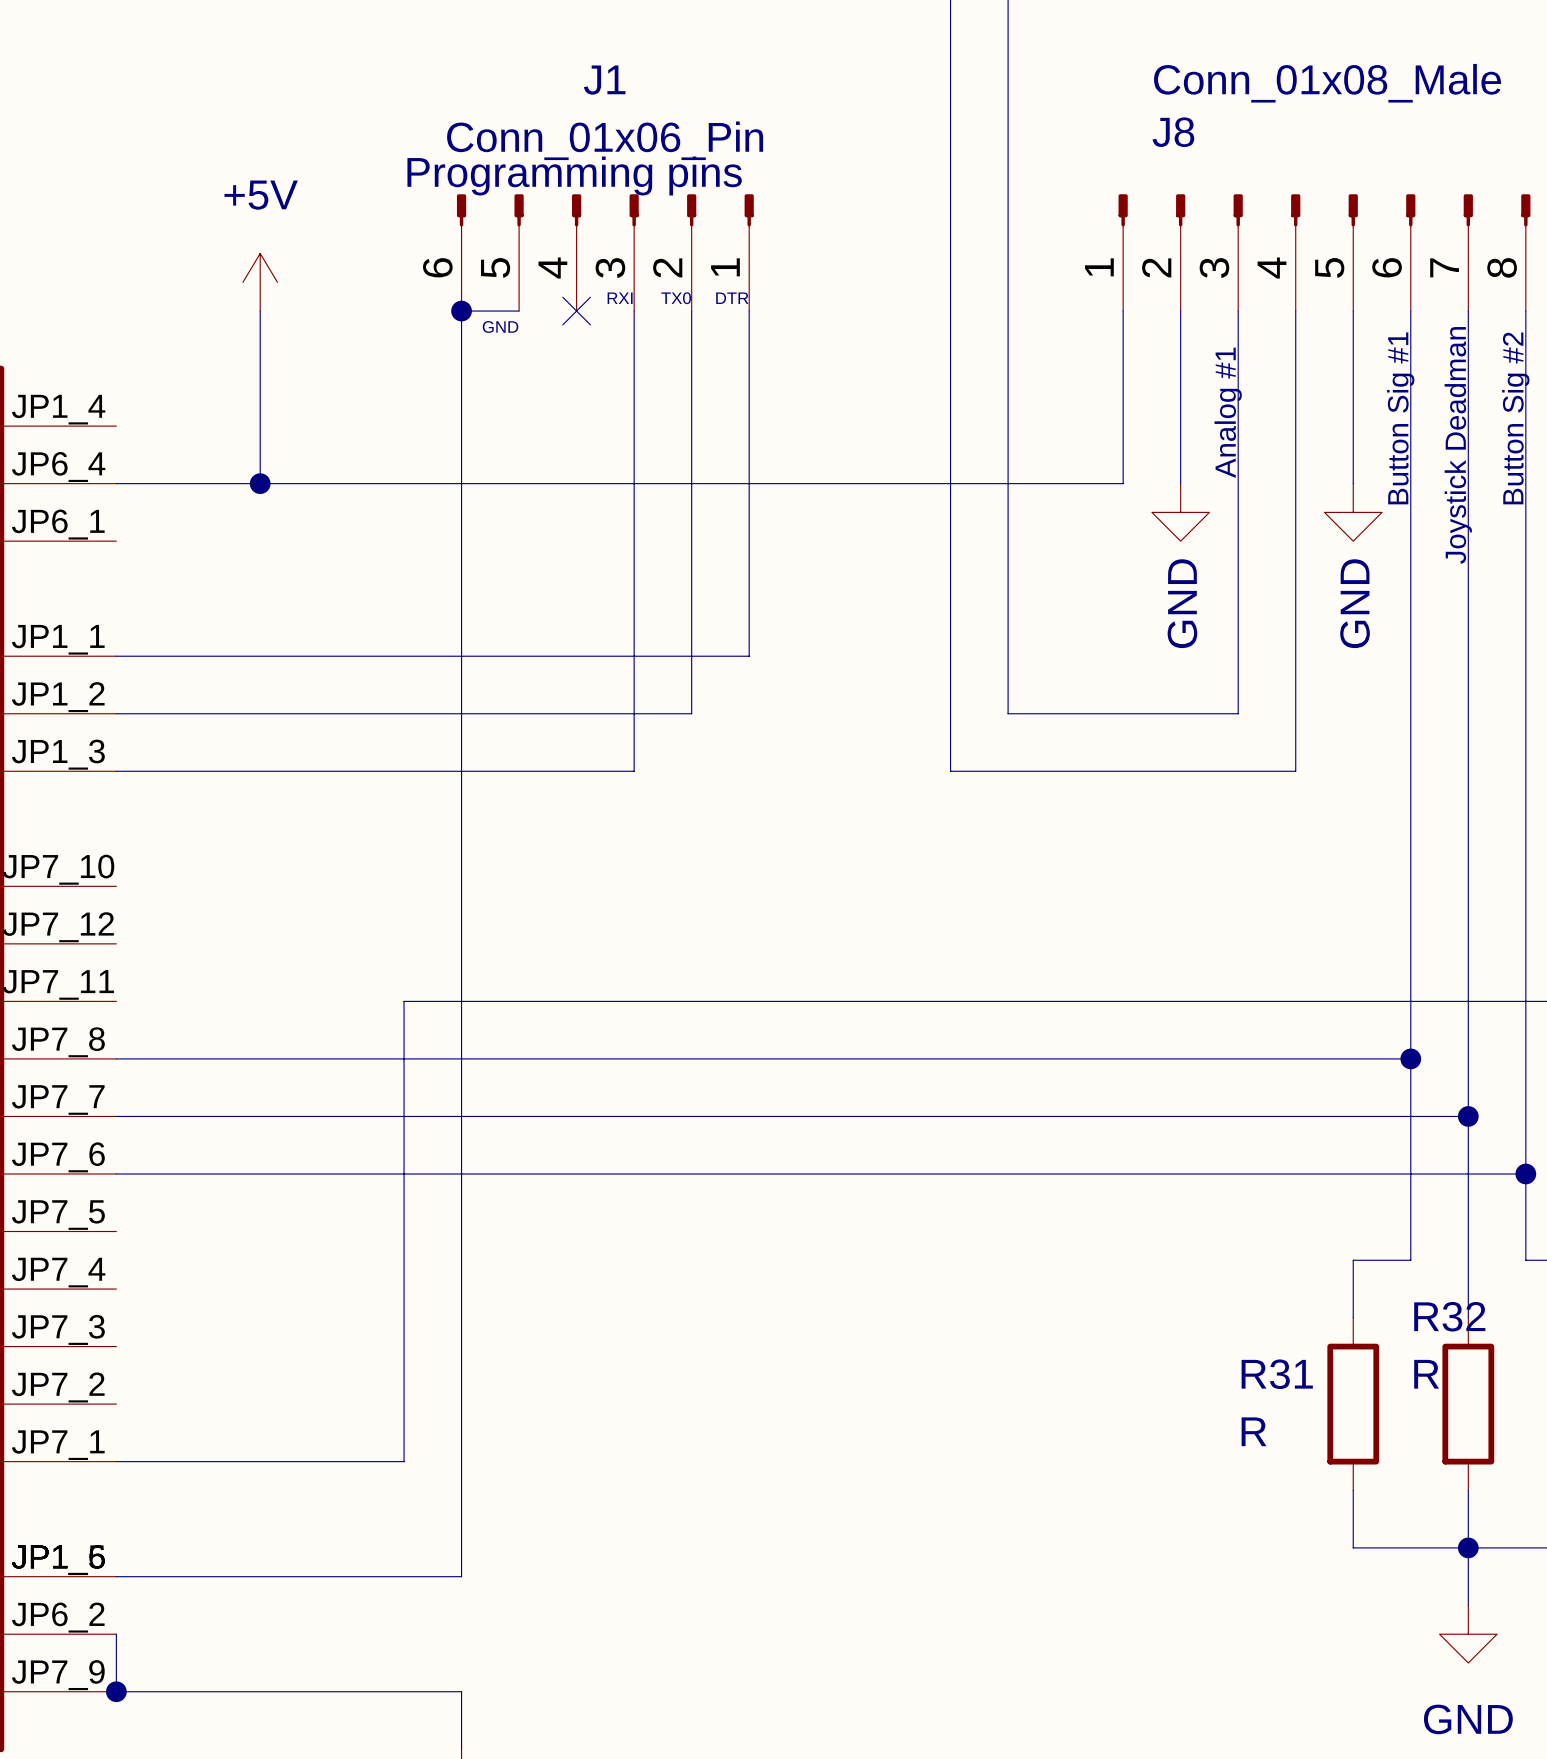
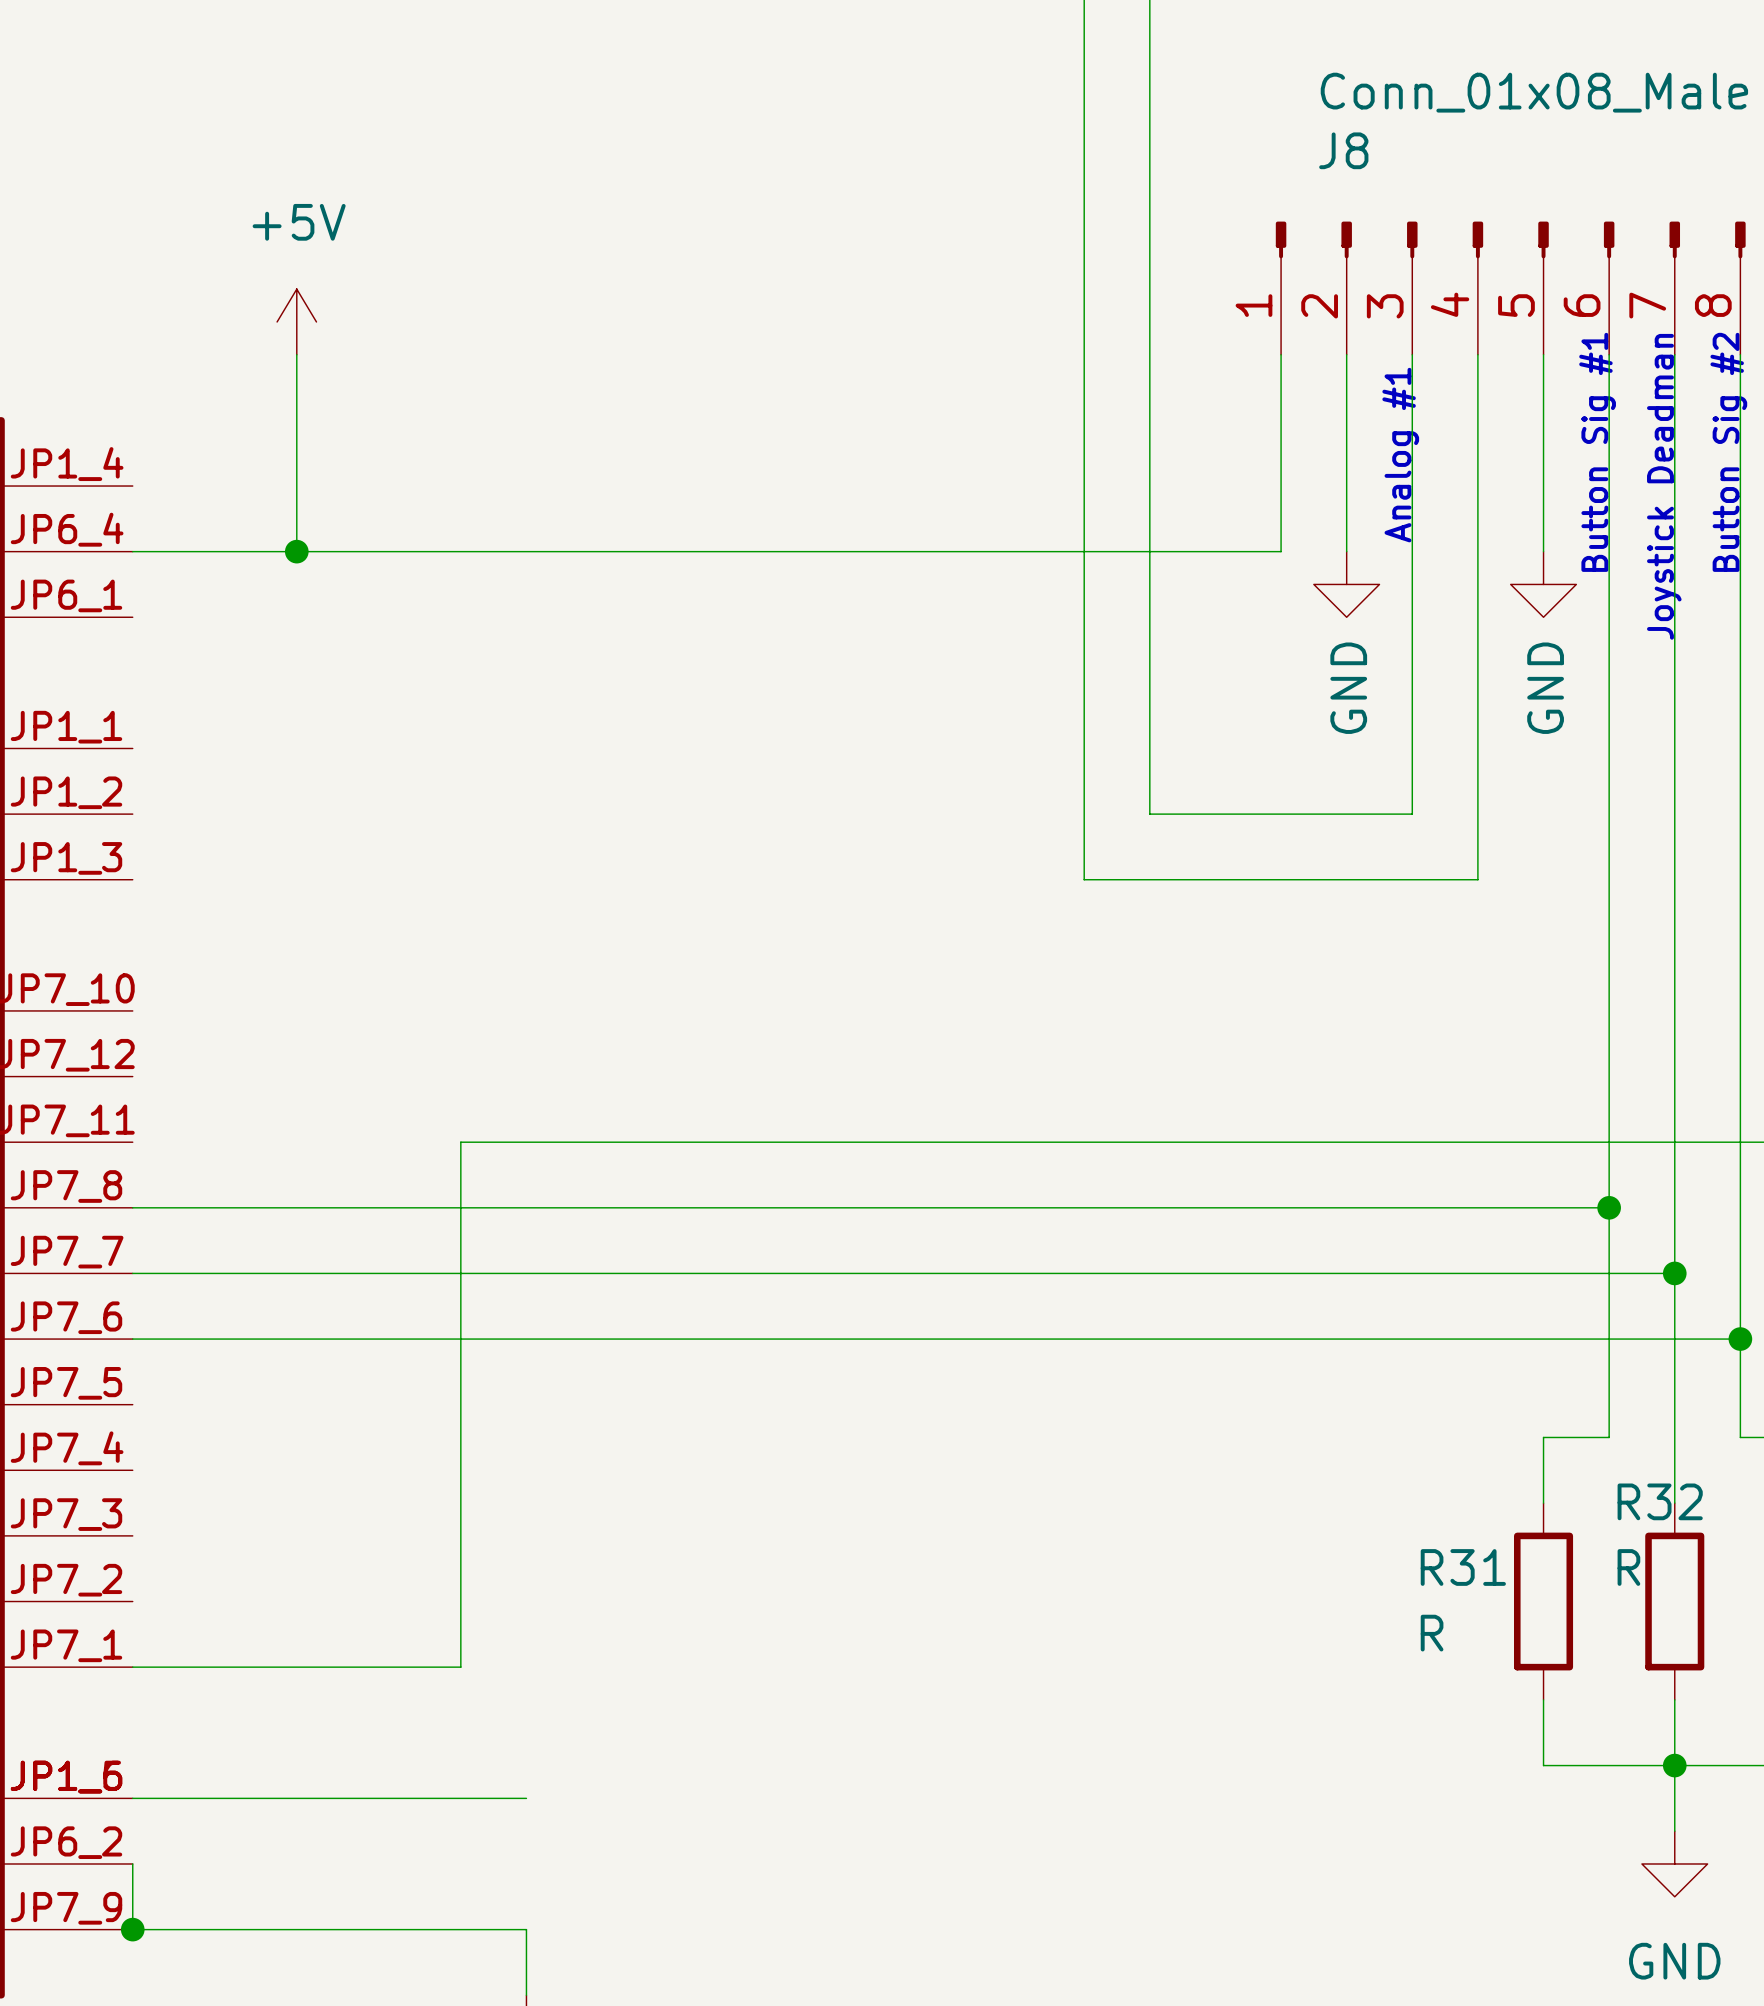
text: Programming pins (574, 175) -> none
J1: Conn_01x06_Pin (605, 252) -> none
text: RXI (620, 298) -> none
text: TX0 (676, 298) -> none
text: DTR (732, 298) -> none
junction: (461, 311) -> none
wire: (519, 311) (461, 311) (461, 1576) -> none
no-connect mark: (576, 311) -> none
wire: (634, 311) (634, 771) (116, 771) -> none
wire: (691, 311) (691, 713) (116, 713) -> none
wire: (749, 311) (749, 656) (116, 656) -> none
text: GND (500, 326) -> none

